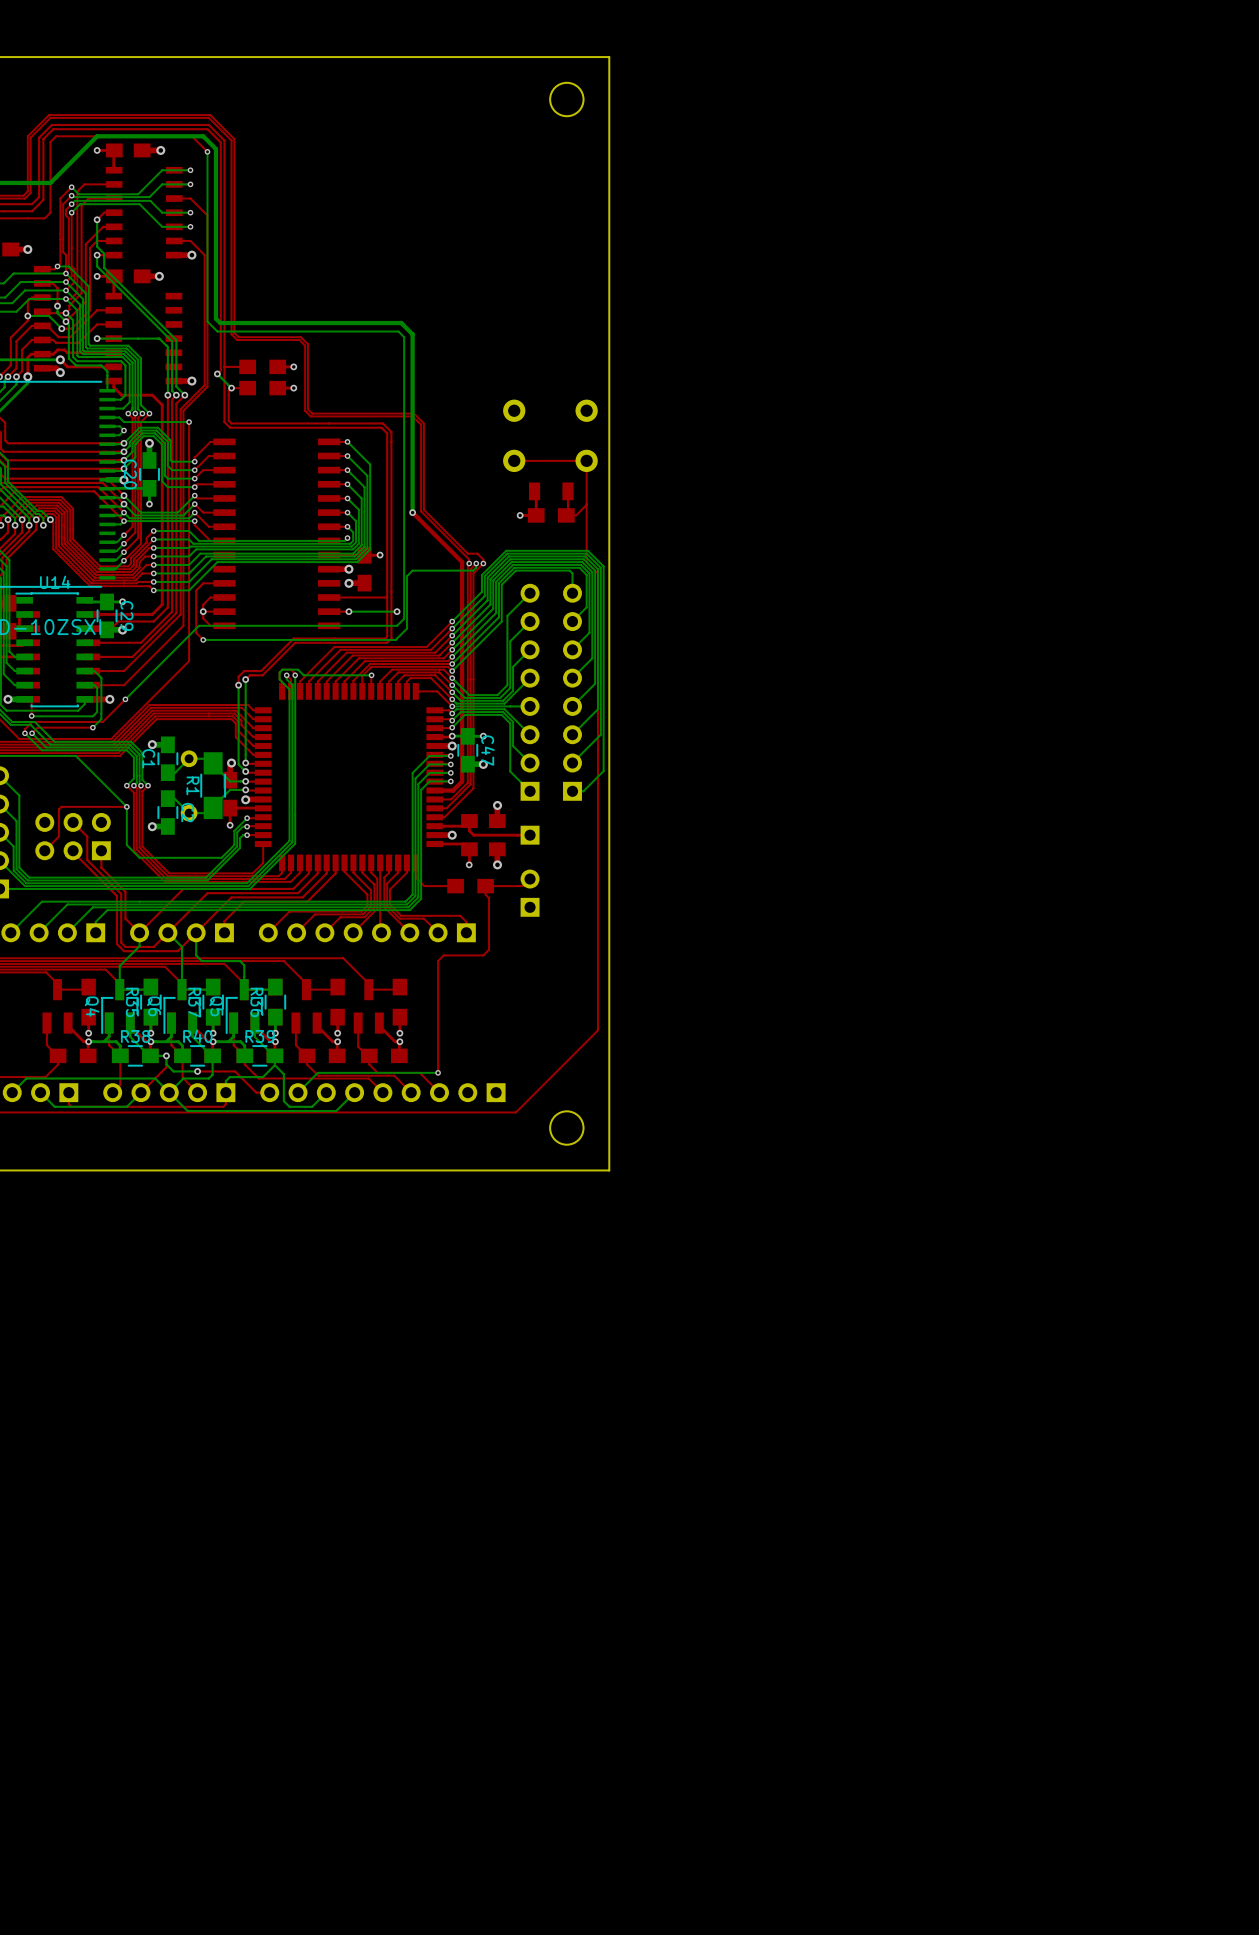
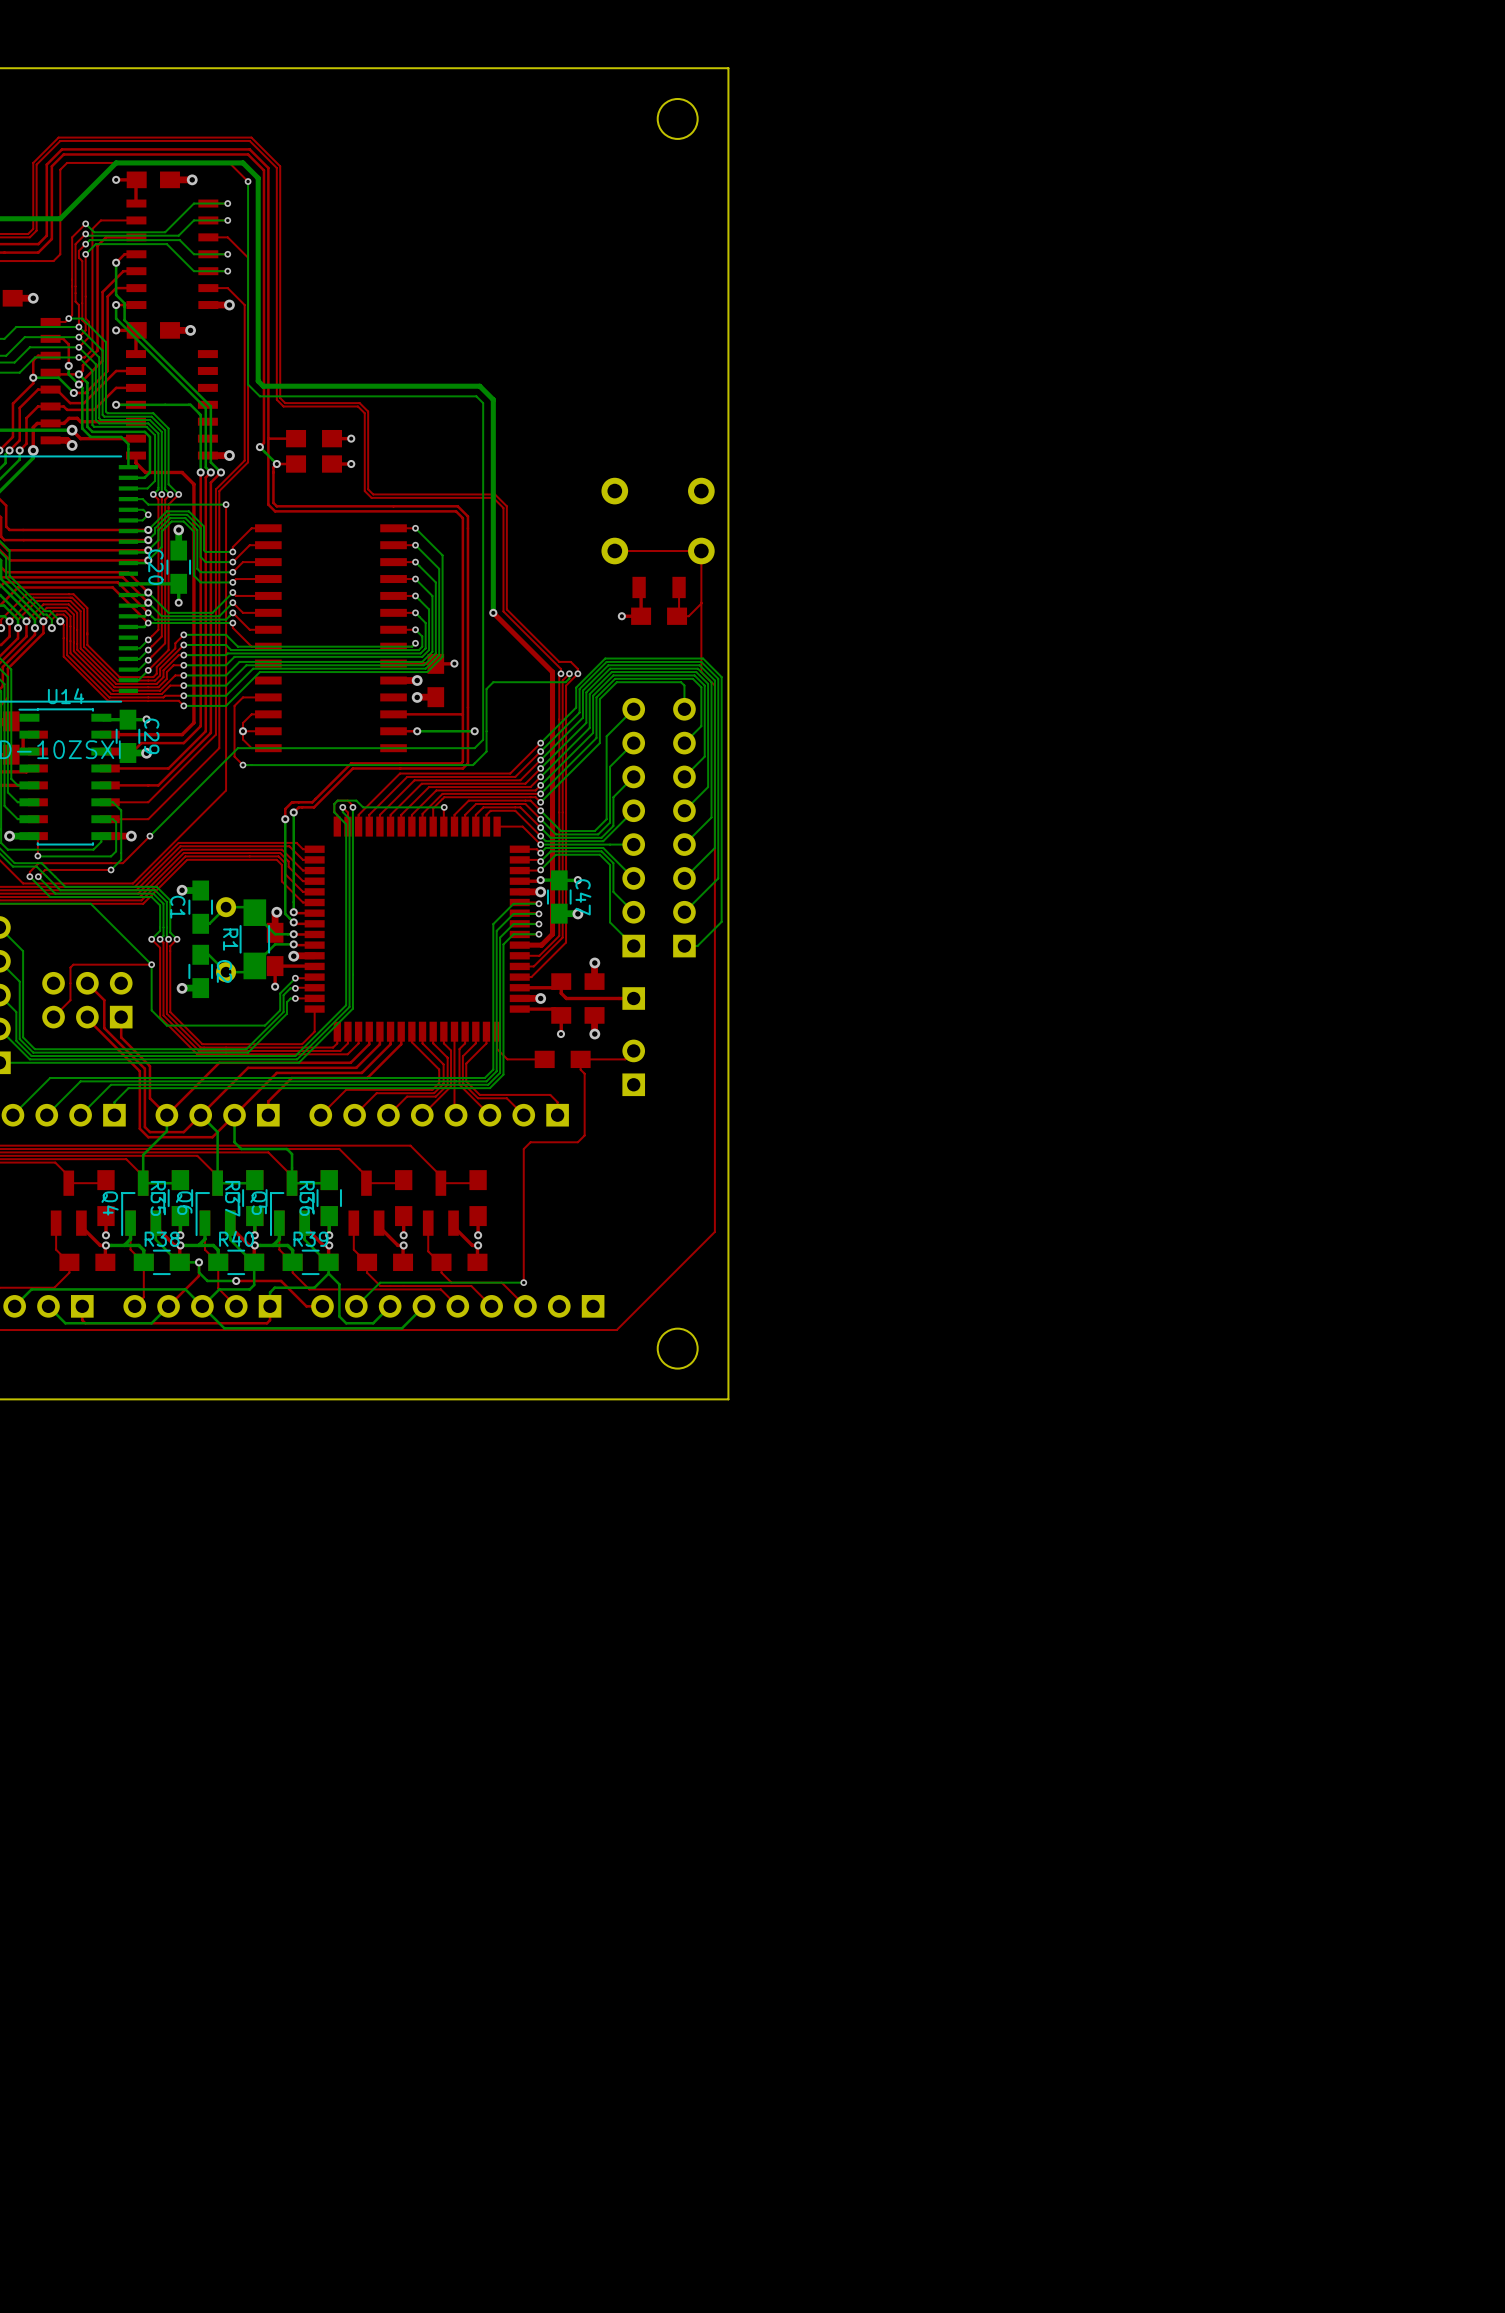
bottom track: (107, 479) (124, 480) -> none
via: (124, 480) -> none

